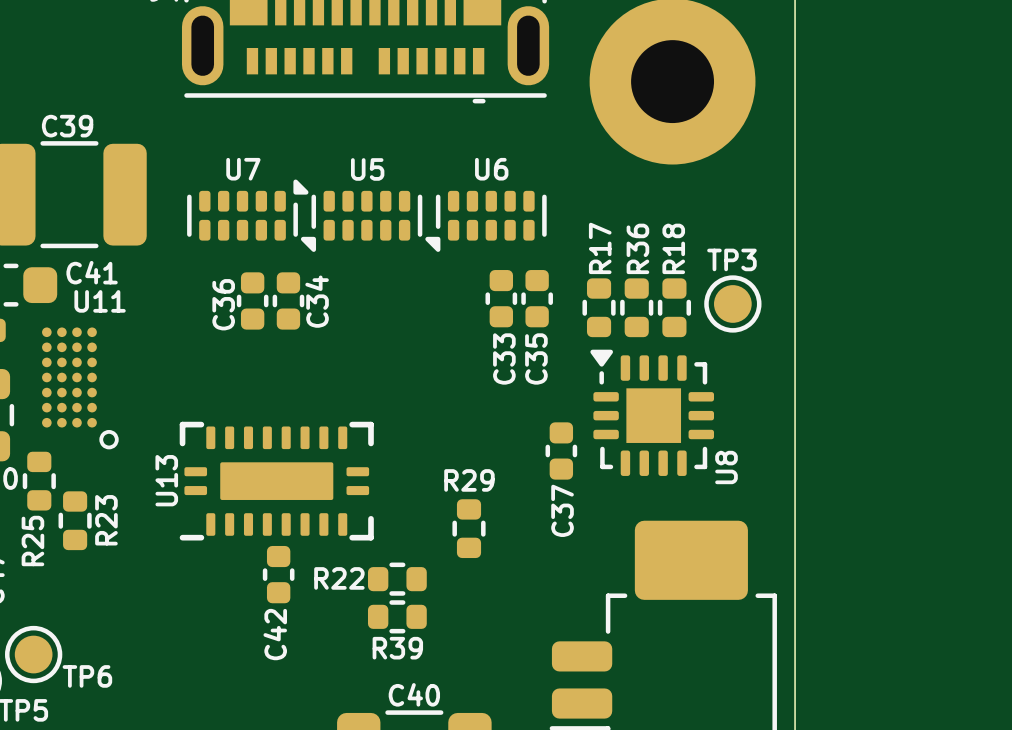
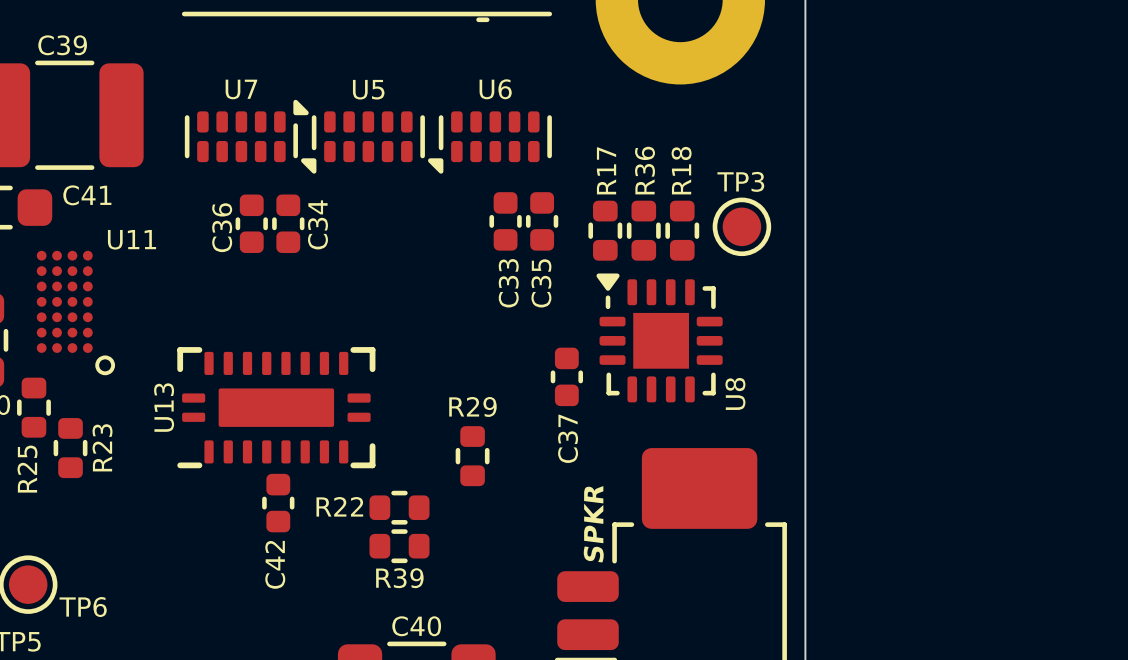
U11 name position: U11 (100, 301) -> U11 (132, 239)
text: none -> SPKR (593, 524)

